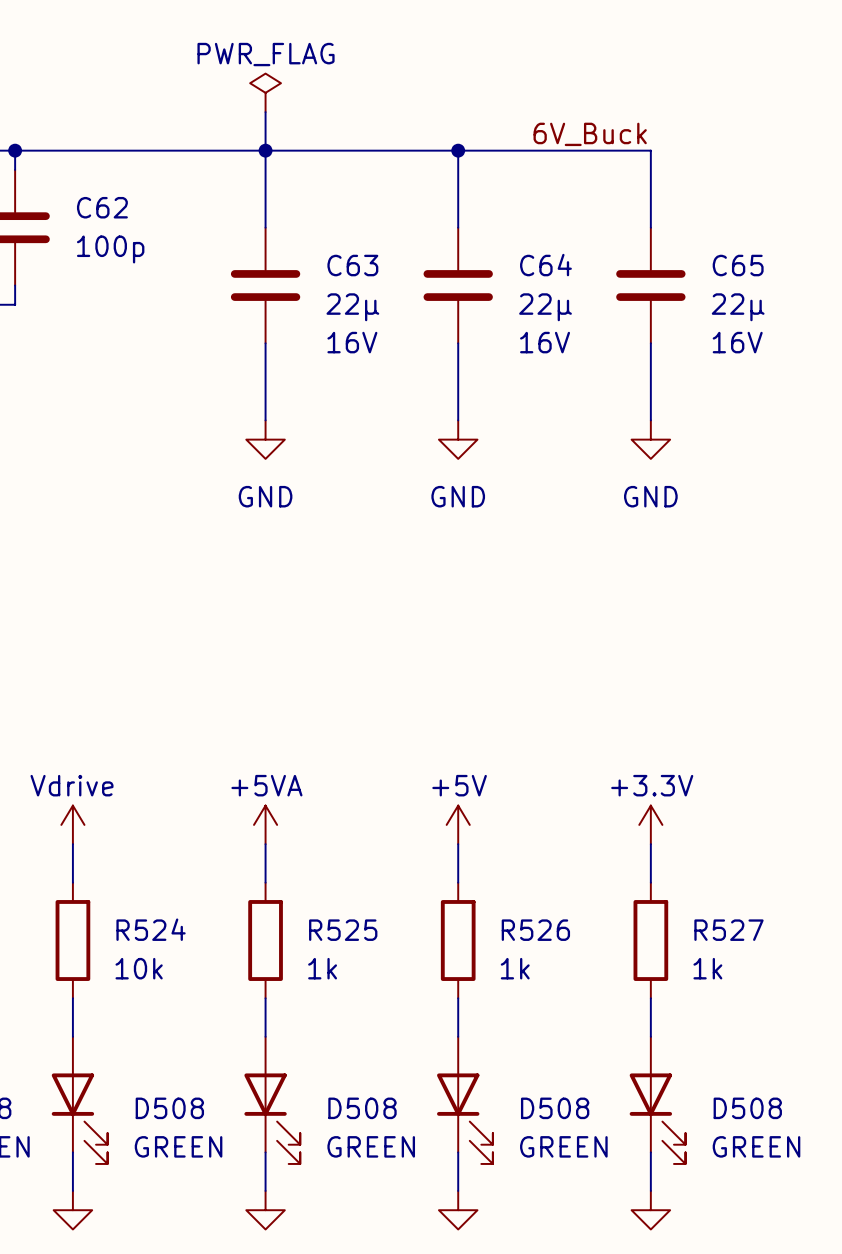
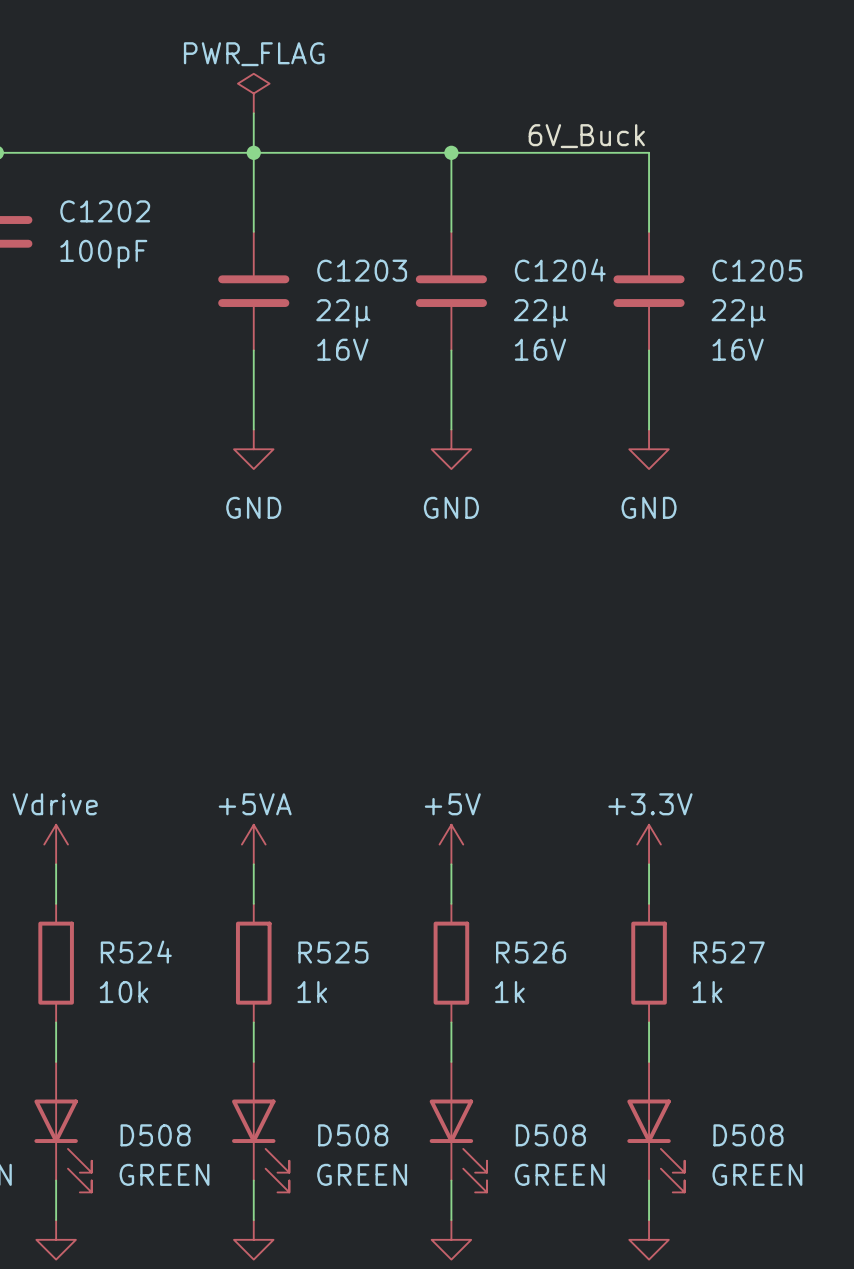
C62 name: C62 (102, 207) -> C1202 (105, 211)
C62 value: 100p (110, 249) -> 100pF (103, 254)
C63 name: C63 (352, 265) -> C1203 (362, 270)
C64 name: C64 (545, 265) -> C1204 (560, 270)
C65 name: C65 (738, 265) -> C1205 (757, 270)

